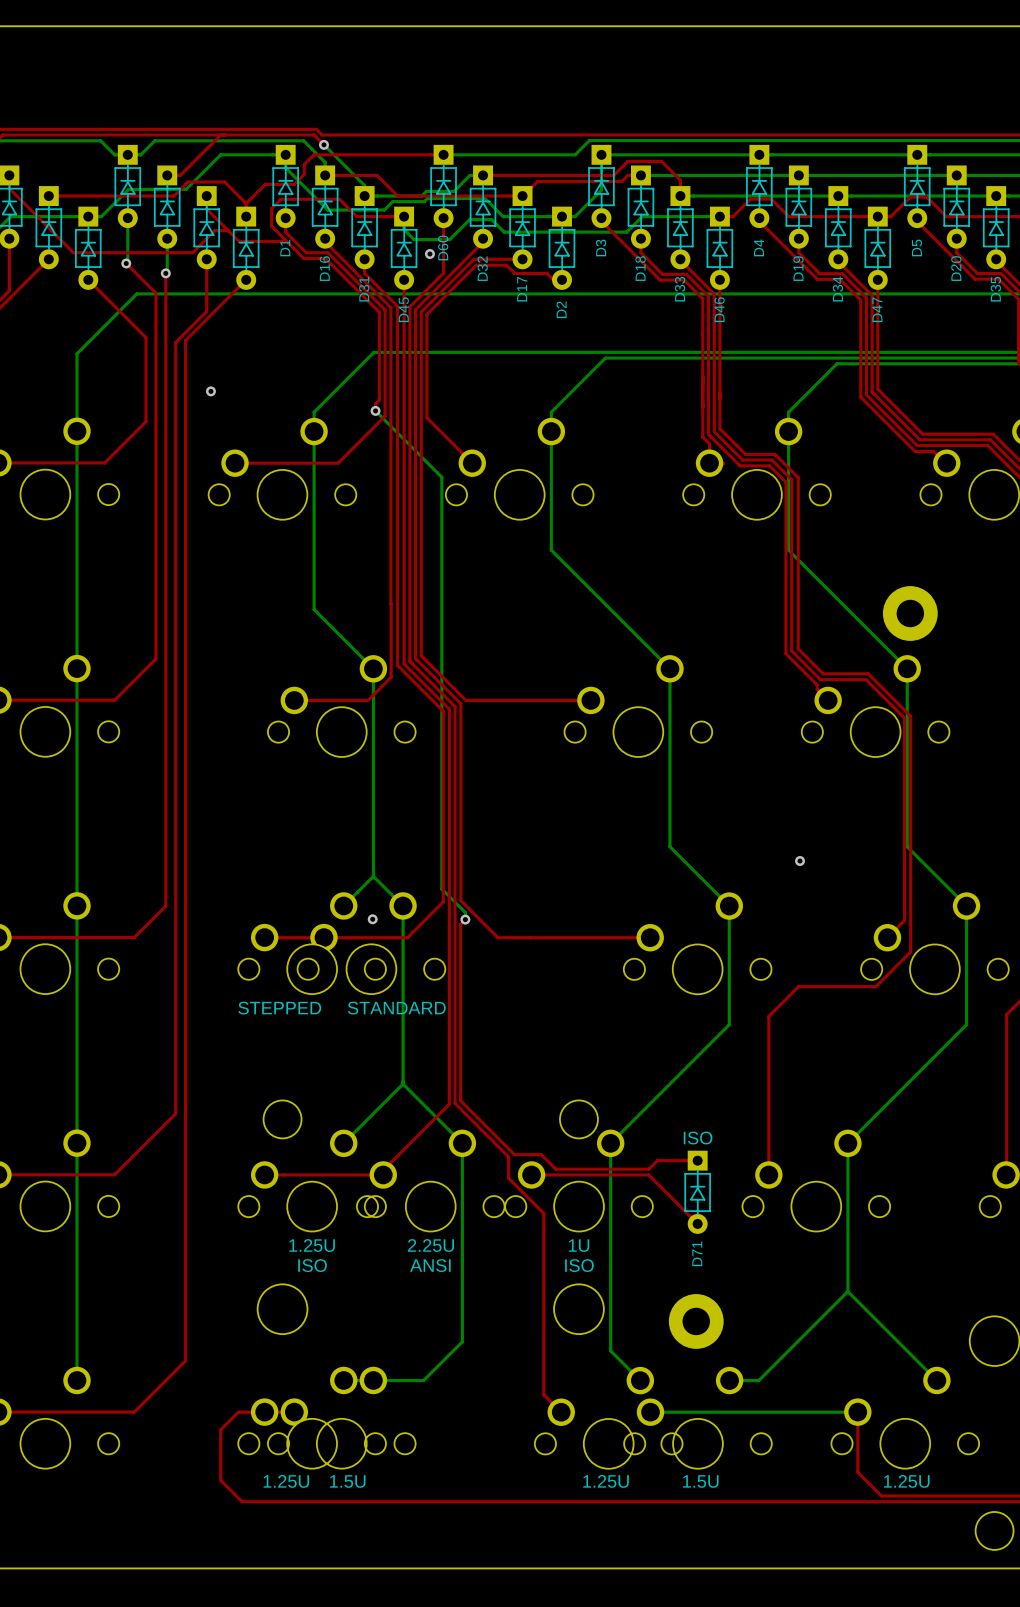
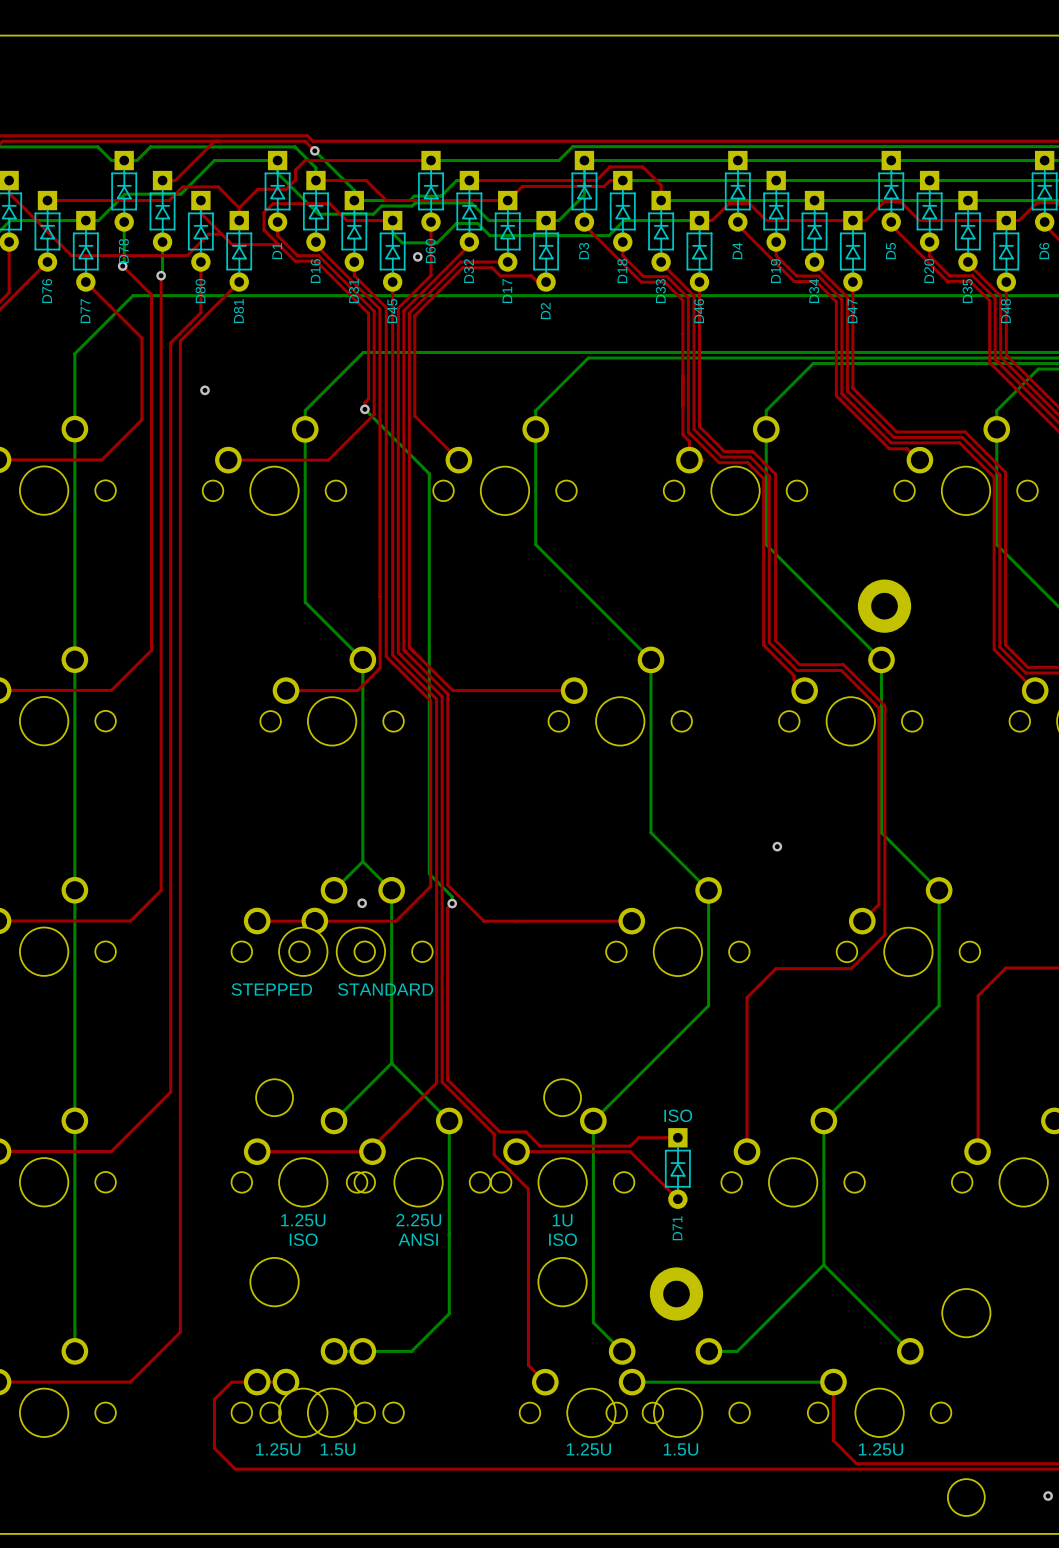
D78 name: none -> D78 (123, 251)
D76 name: none -> D76 (47, 291)
D80 name: none -> D80 (200, 291)
D77 name: none -> D77 (85, 311)
D81 name: none -> D81 (238, 311)

